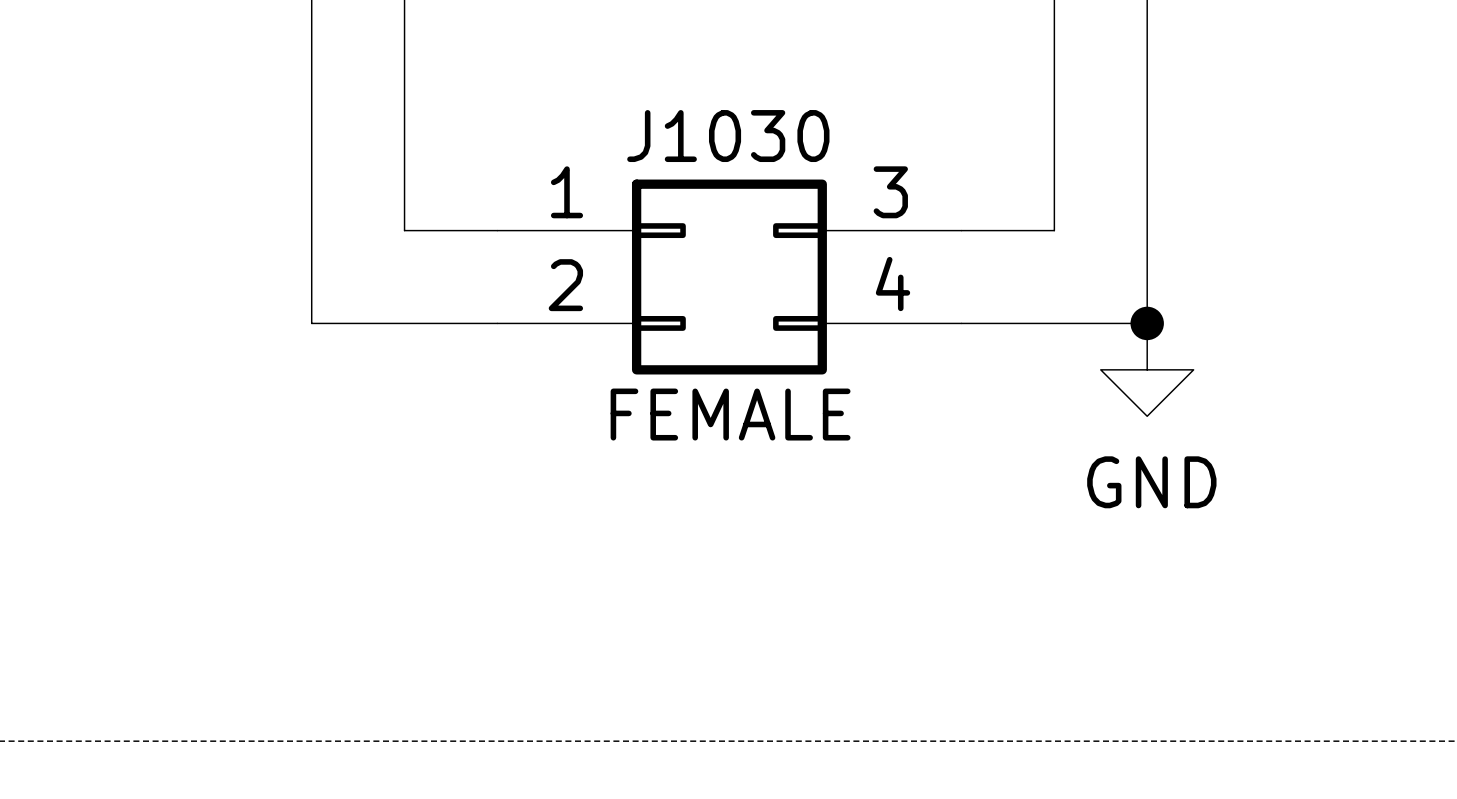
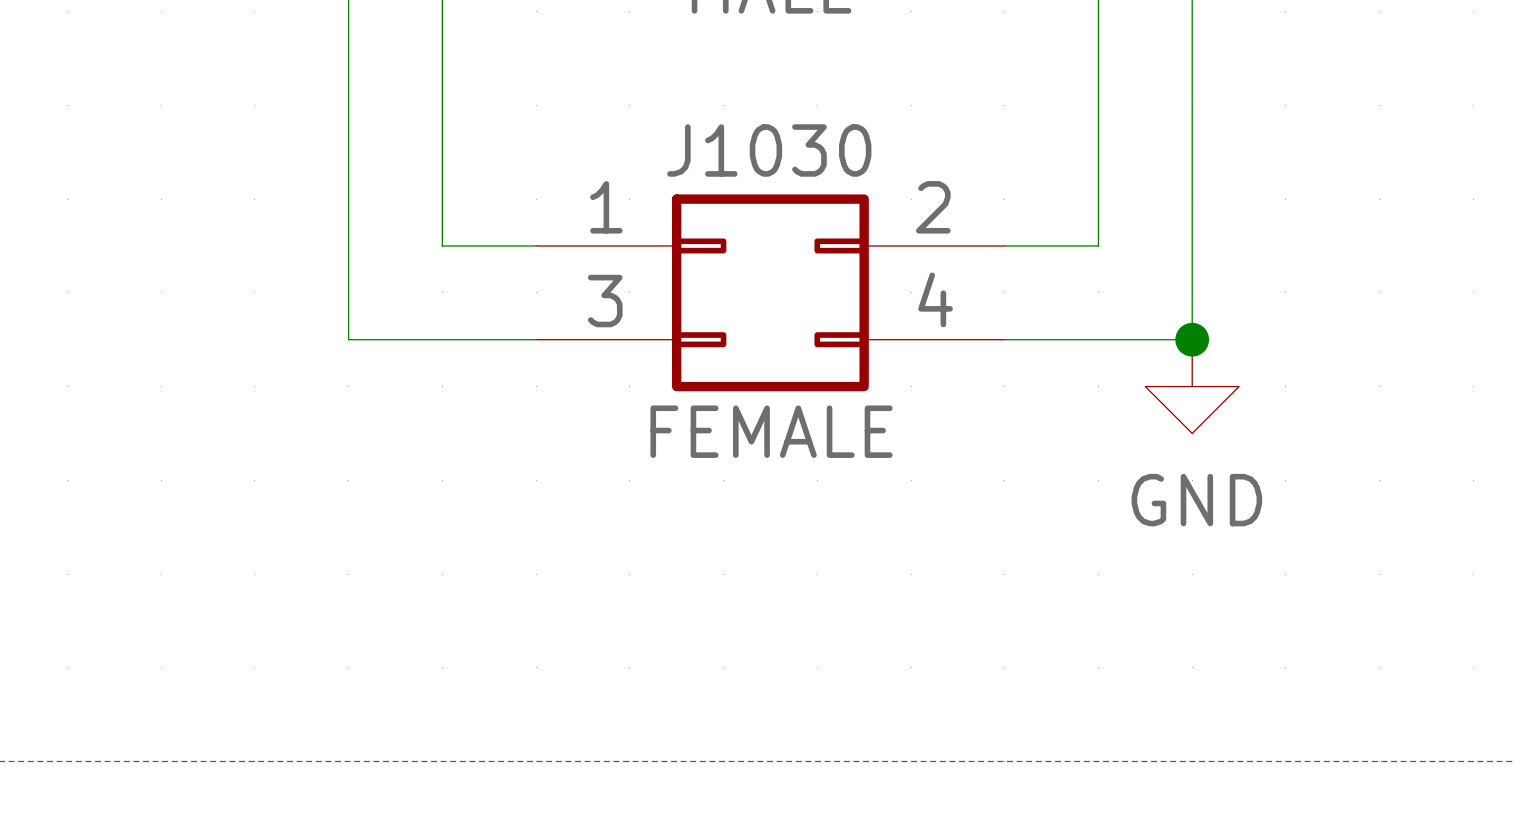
part pin number: 3 (890, 192) -> 2 (933, 207)
part pin number: 2 (565, 285) -> 3 (605, 301)

